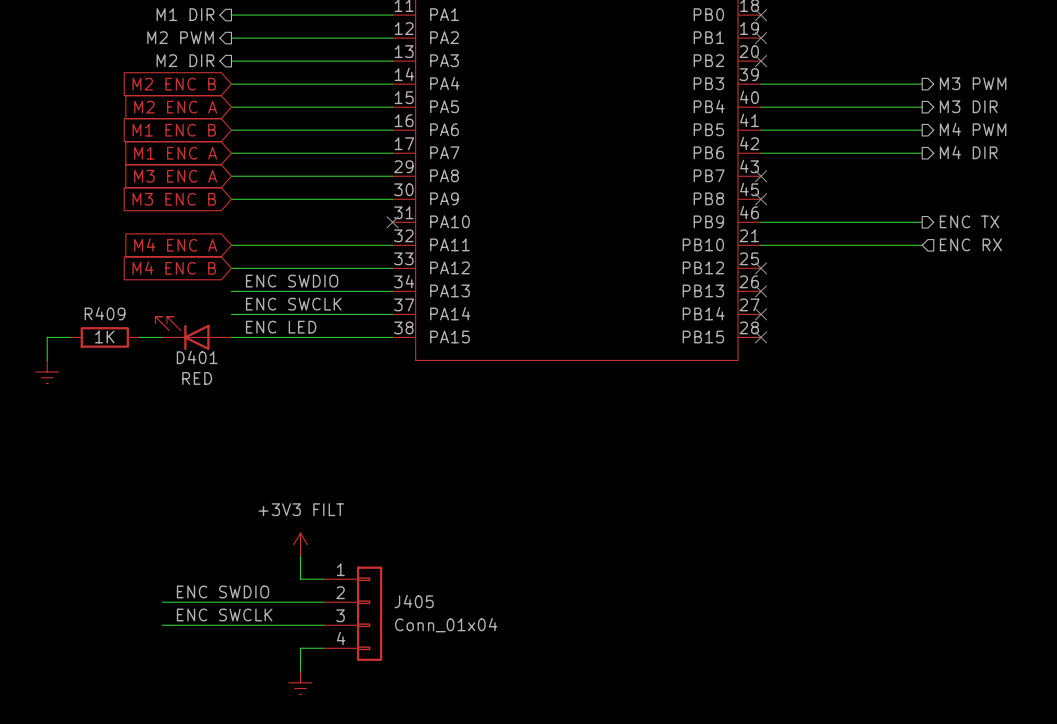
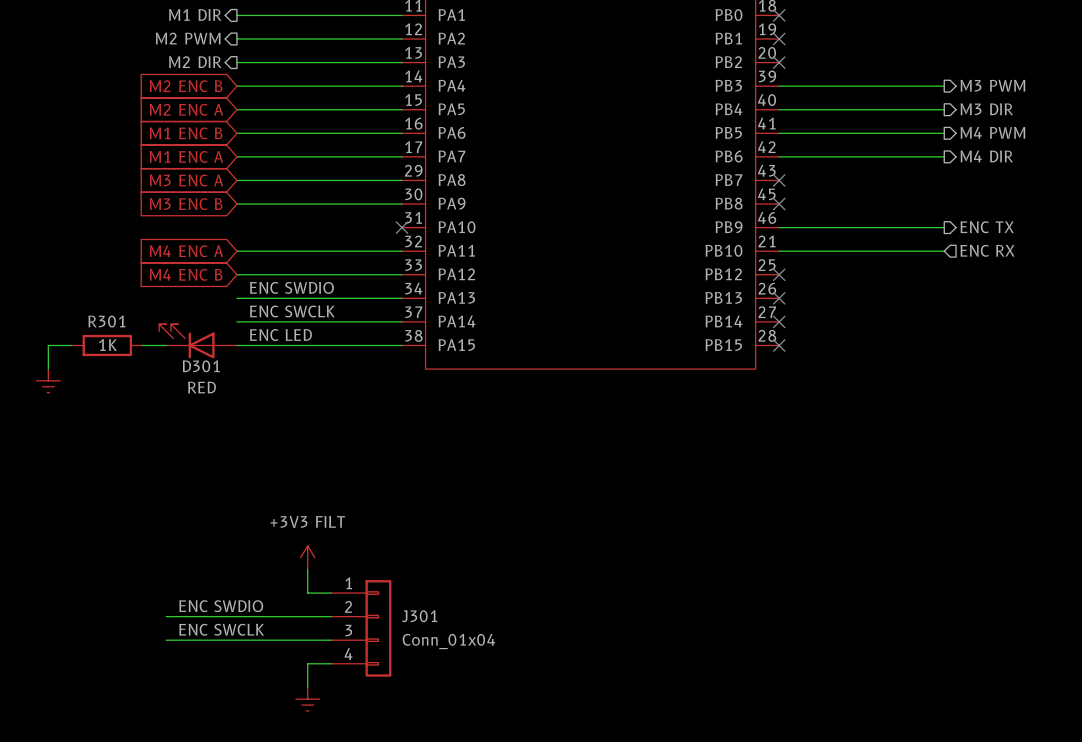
R409 name: R409 (105, 313) -> R301 (106, 321)
D401 name: D401 (197, 357) -> D301 (201, 366)
J405 name: J405 (414, 601) -> J301 (419, 616)

